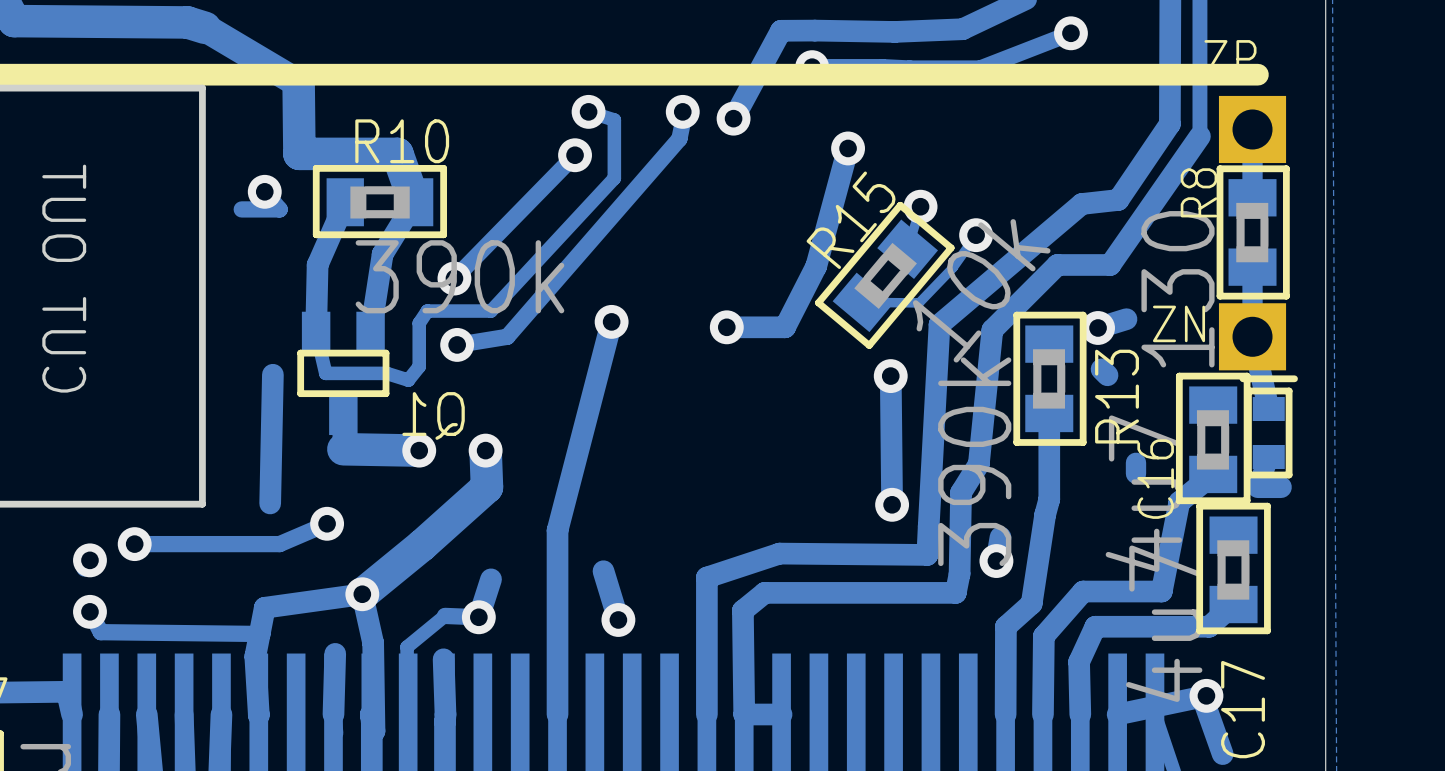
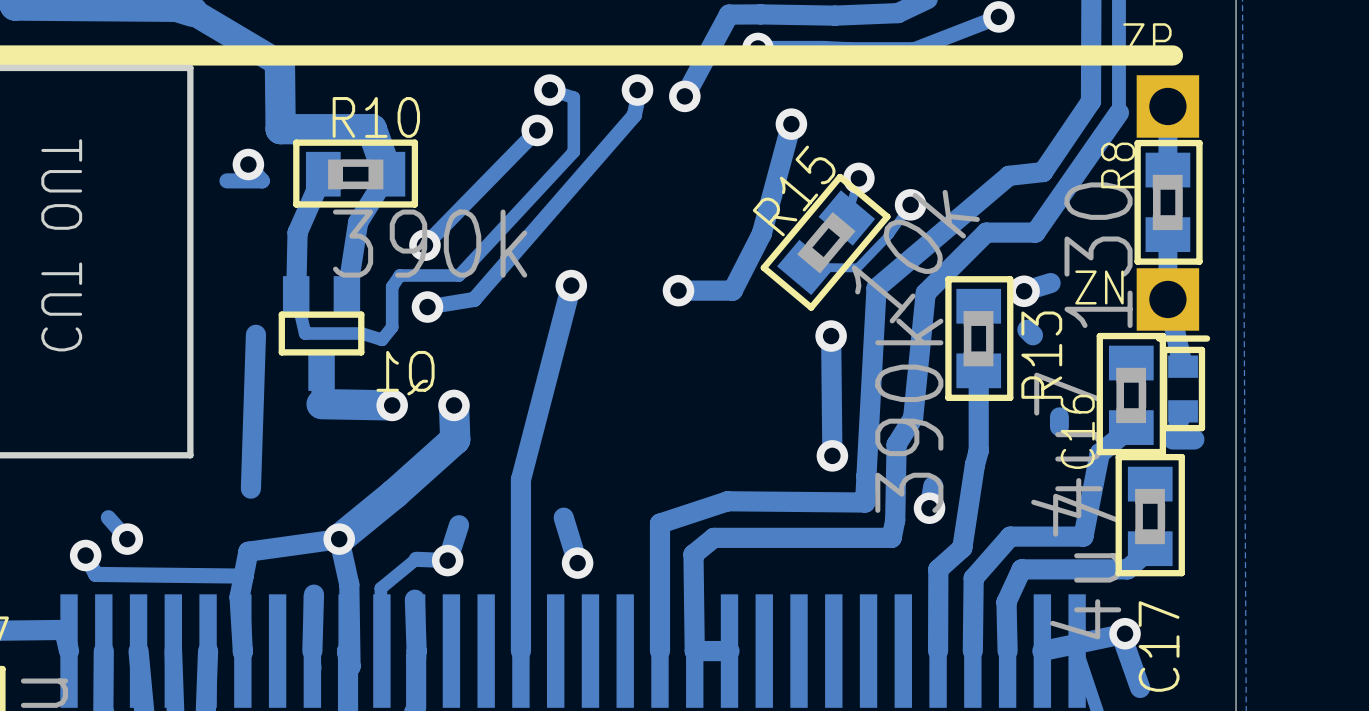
track: (272, 374) (270, 503) -> (255, 334) (250, 488)
track: (327, 523) (279, 544) (134, 544) -> none
via: (327, 523) -> none
via: (134, 544) -> none
via: (89, 560) -> none
track: none -> (108, 517) (127, 539)
via: none -> (127, 539)

